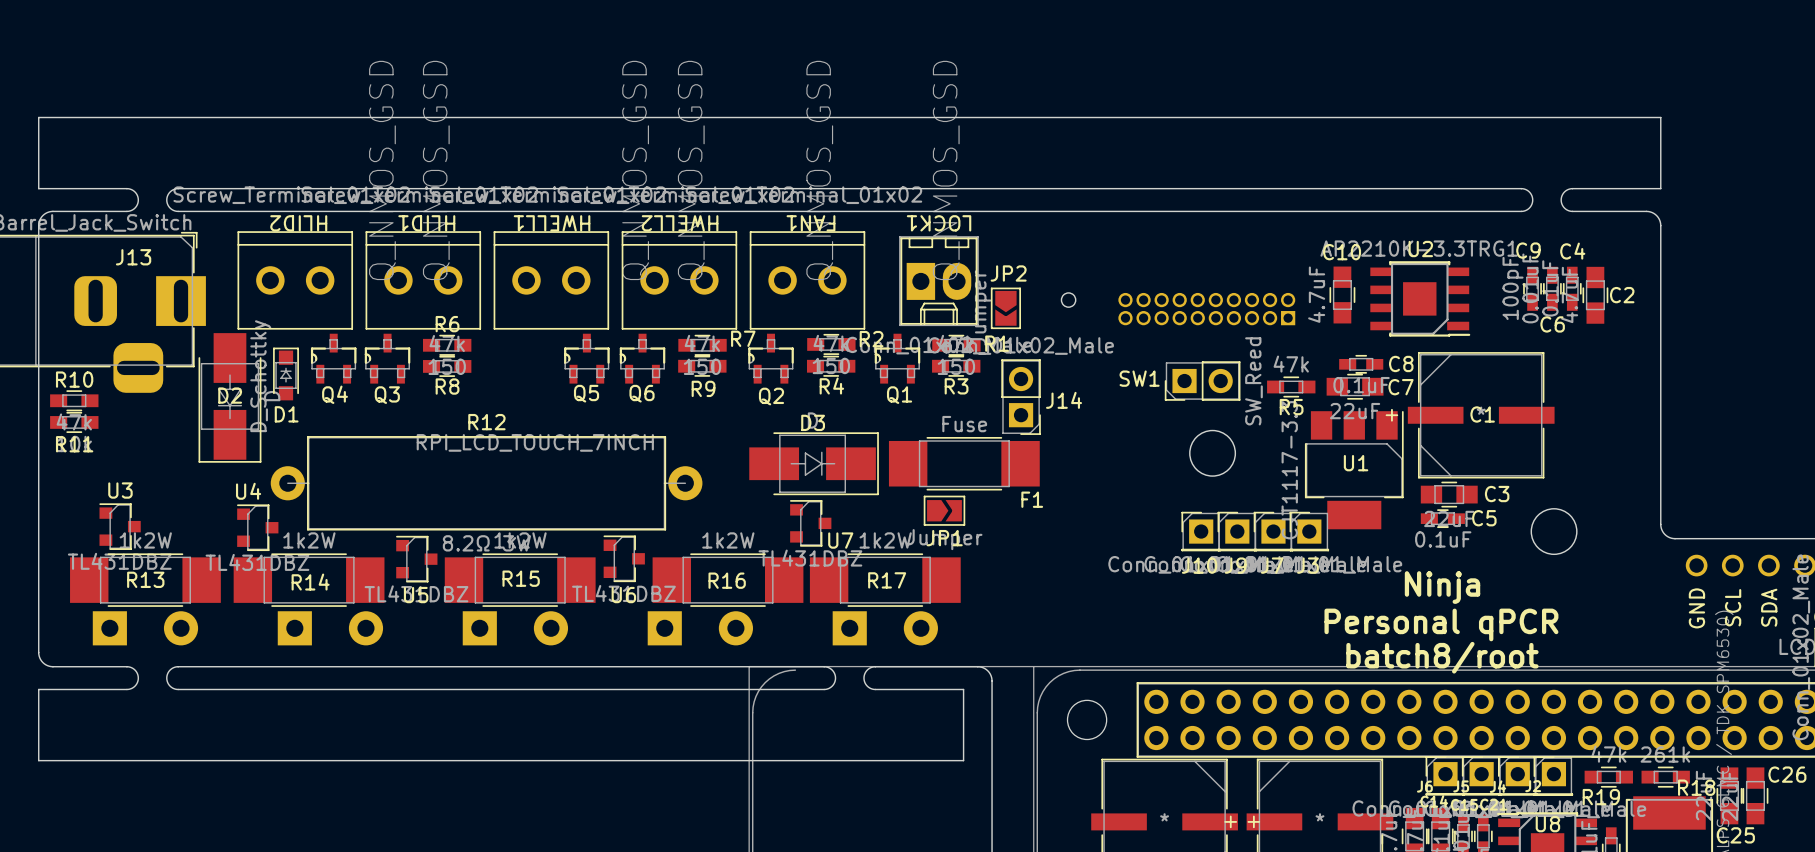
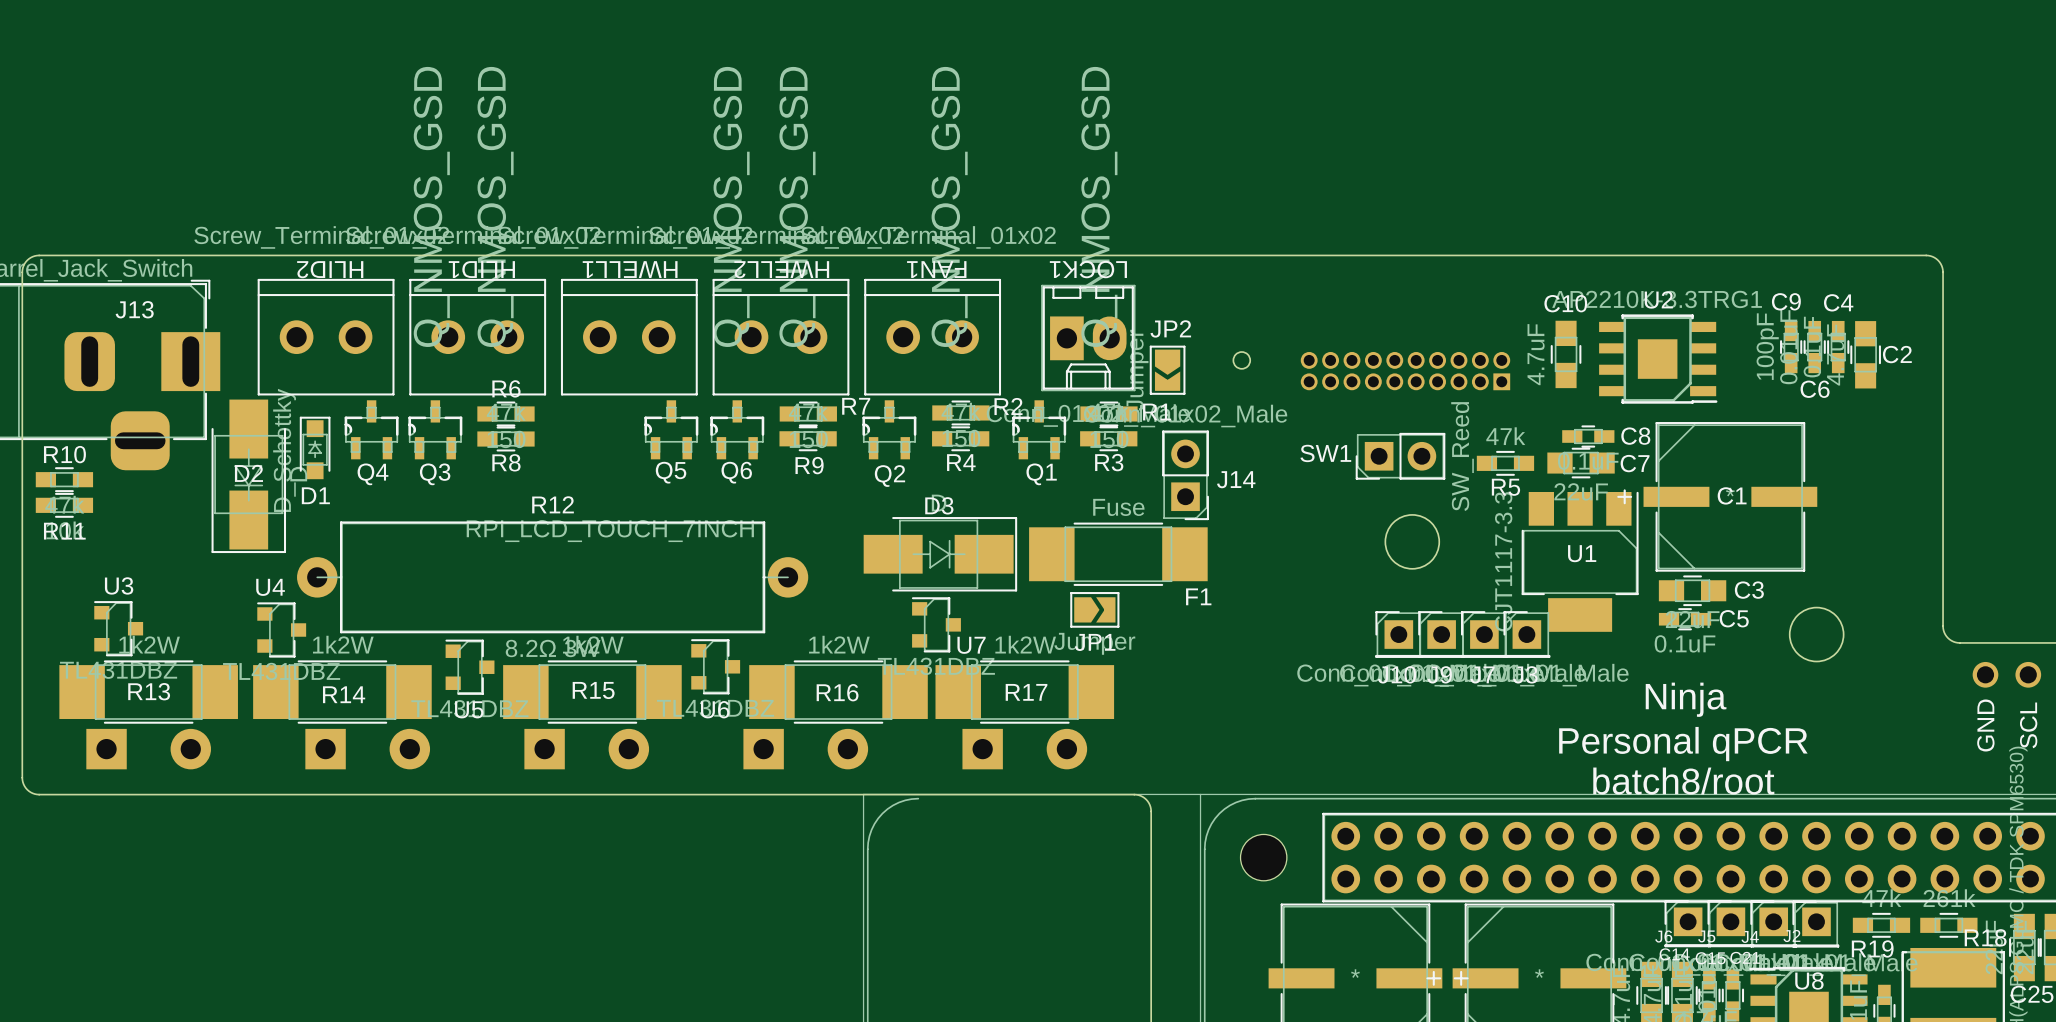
board edge: (126, 211) (134, 208) (138, 201) (136, 194) (129, 189) (38, 188) (38, 117) (1660, 117) (1660, 188) (1569, 189) (1563, 193) (1561, 201) (1565, 209) (1572, 211) -> (1777, 255) (1838, 255)
board edge: (178, 211) (170, 208) (166, 200) (170, 191) (178, 188) (1521, 188) (1529, 191) (1532, 200) (1529, 208) (1521, 211) -> (187, 255) (126, 255)
board edge: (126, 666) (134, 670) (138, 676) (136, 683) (129, 689) (38, 689) (38, 760) (963, 760) (963, 689) (872, 689) (865, 683) (864, 676) (867, 670) (875, 666) -> (126, 794) (187, 794)
board edge: (178, 666) (170, 670) (166, 678) (170, 686) (178, 689) (824, 689) (832, 686) (835, 678) (832, 670) (824, 666) -> (1012, 794) (952, 794)

